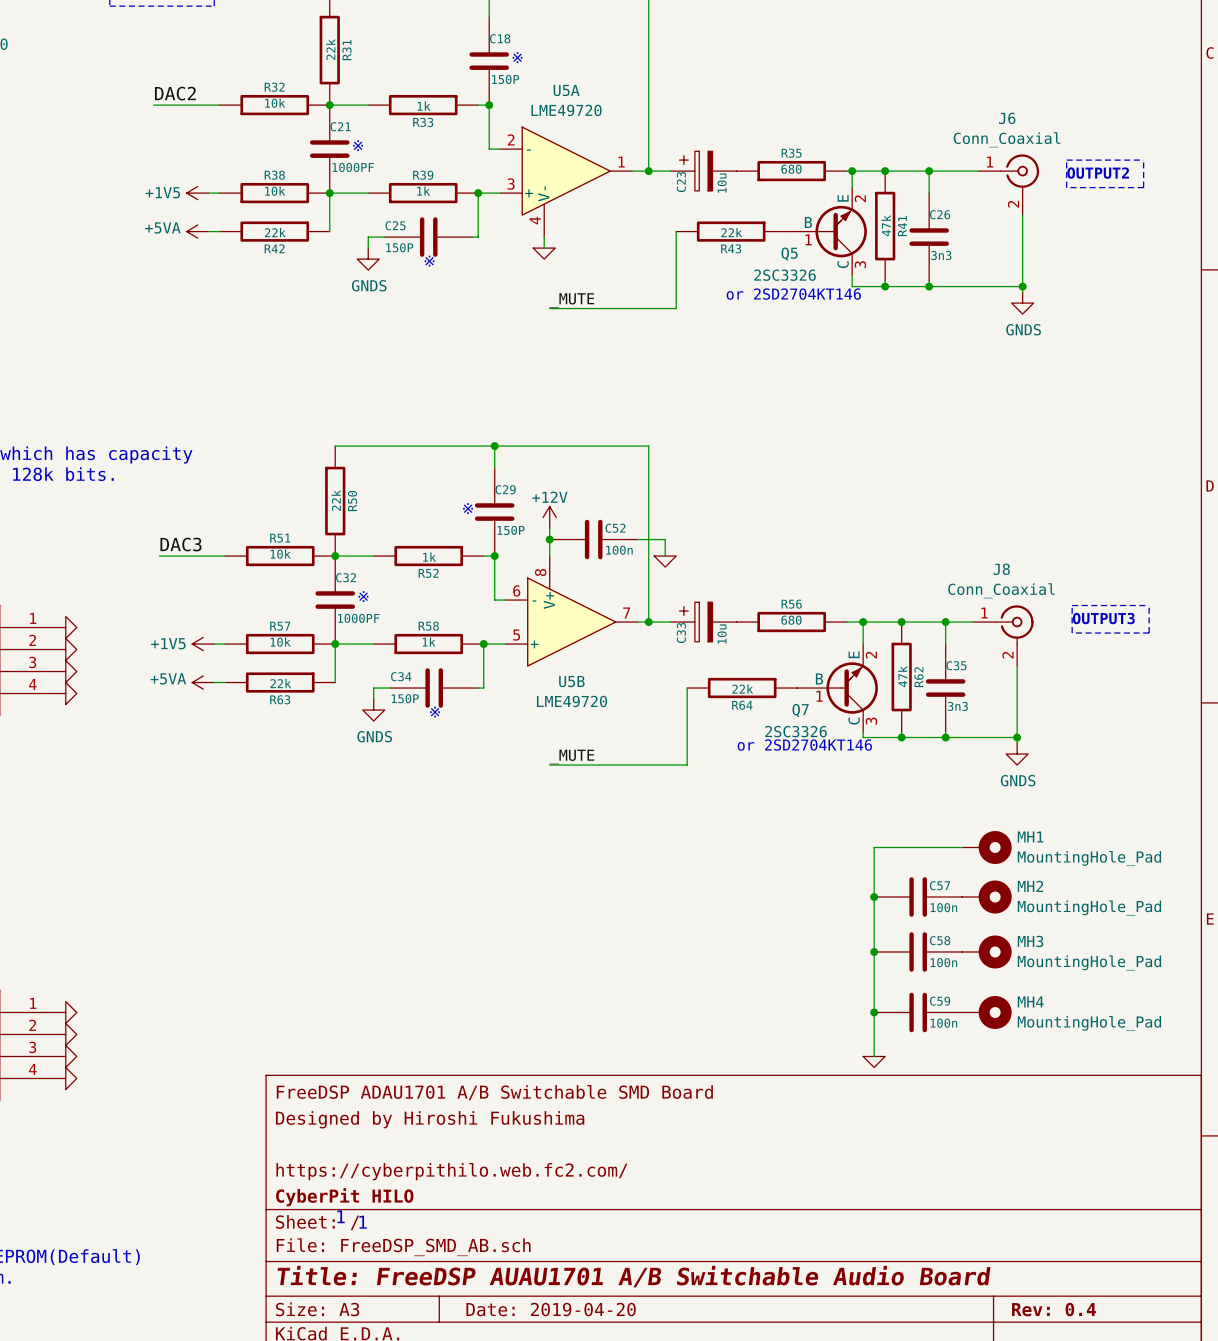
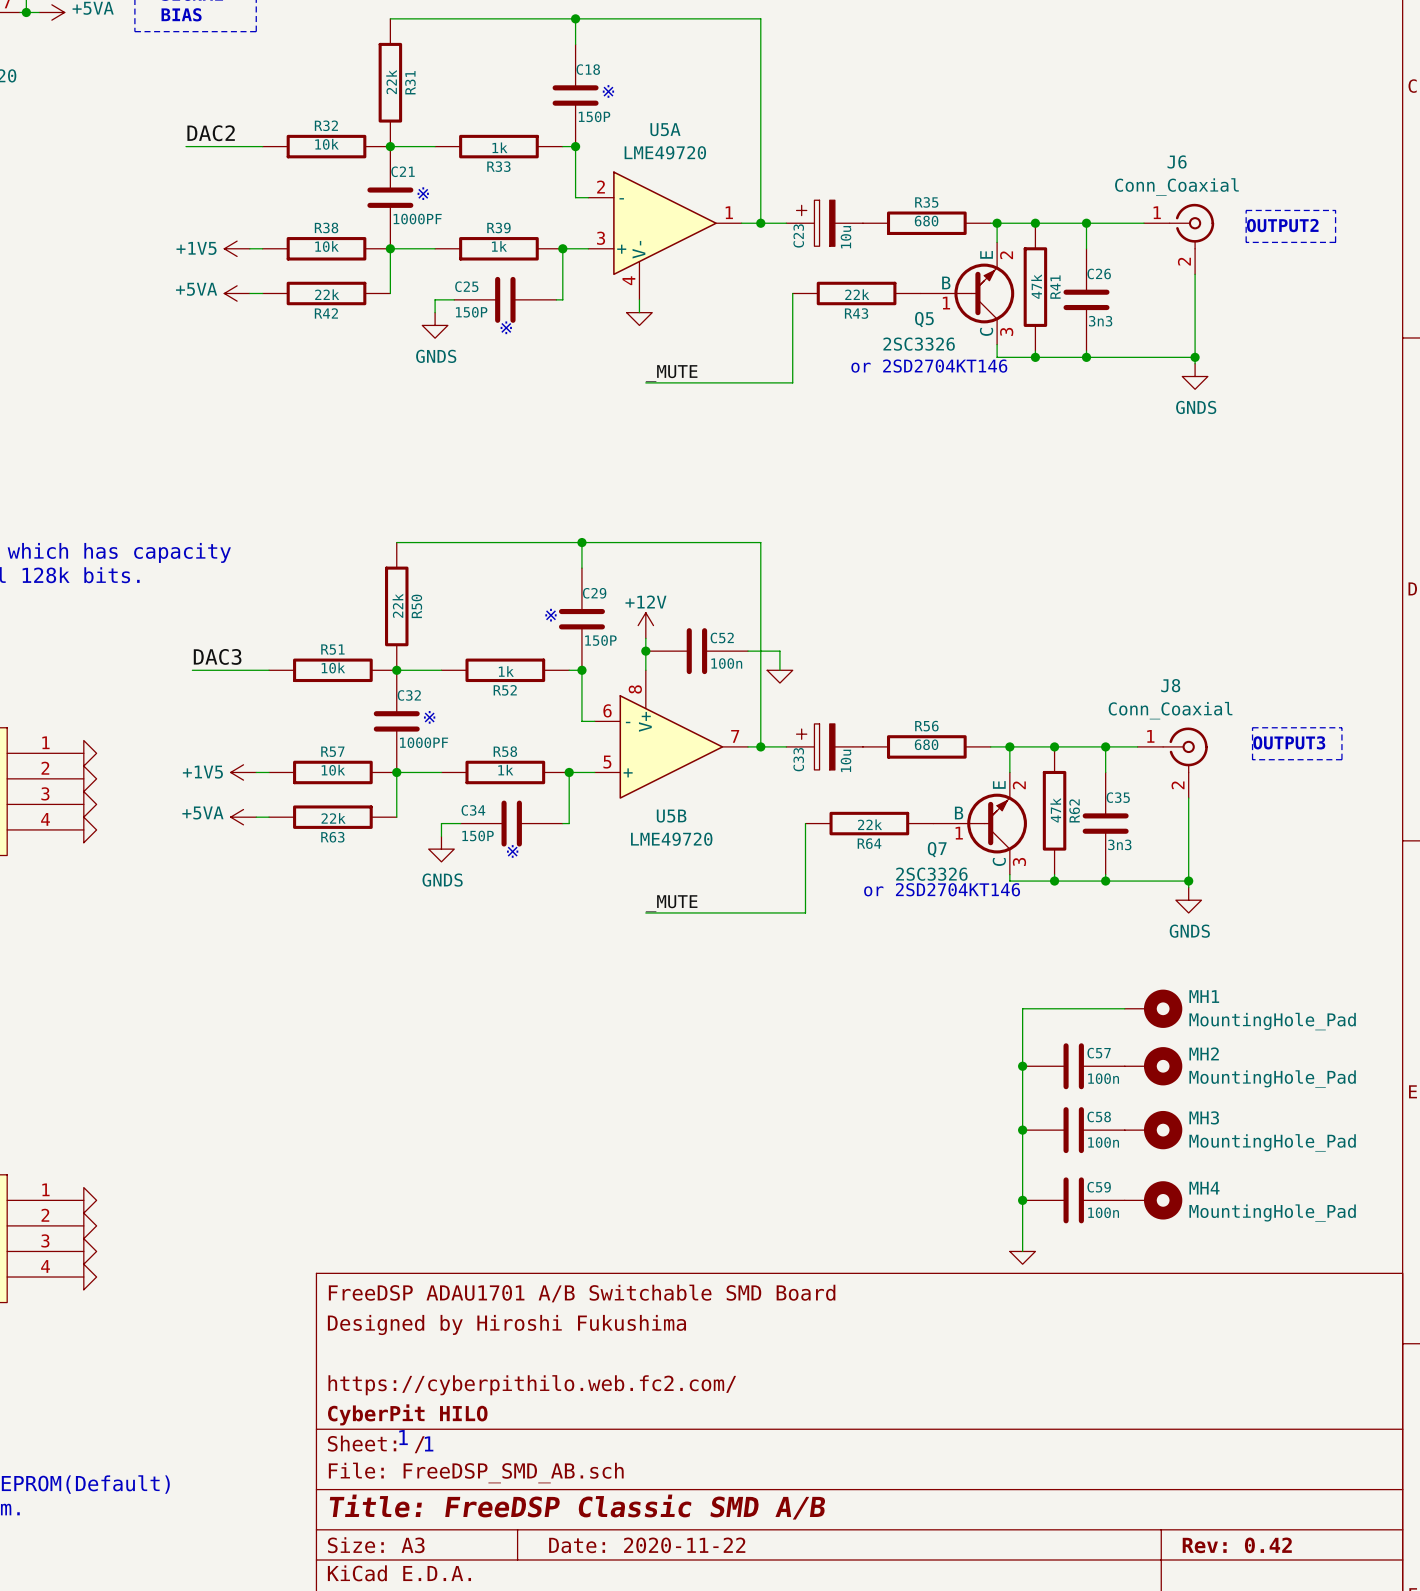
title block: Title: FreeDSP AUAU1701 A/B Switchable Audio Board (633, 1276) -> Title: FreeDSP Classic SMD A/B (577, 1507)
title block: Date: 2019-04-20 (551, 1309) -> Date: 2020-11-22 (647, 1545)
title block: Rev: 0.4 (1053, 1309) -> Rev: 0.42 (1237, 1545)

